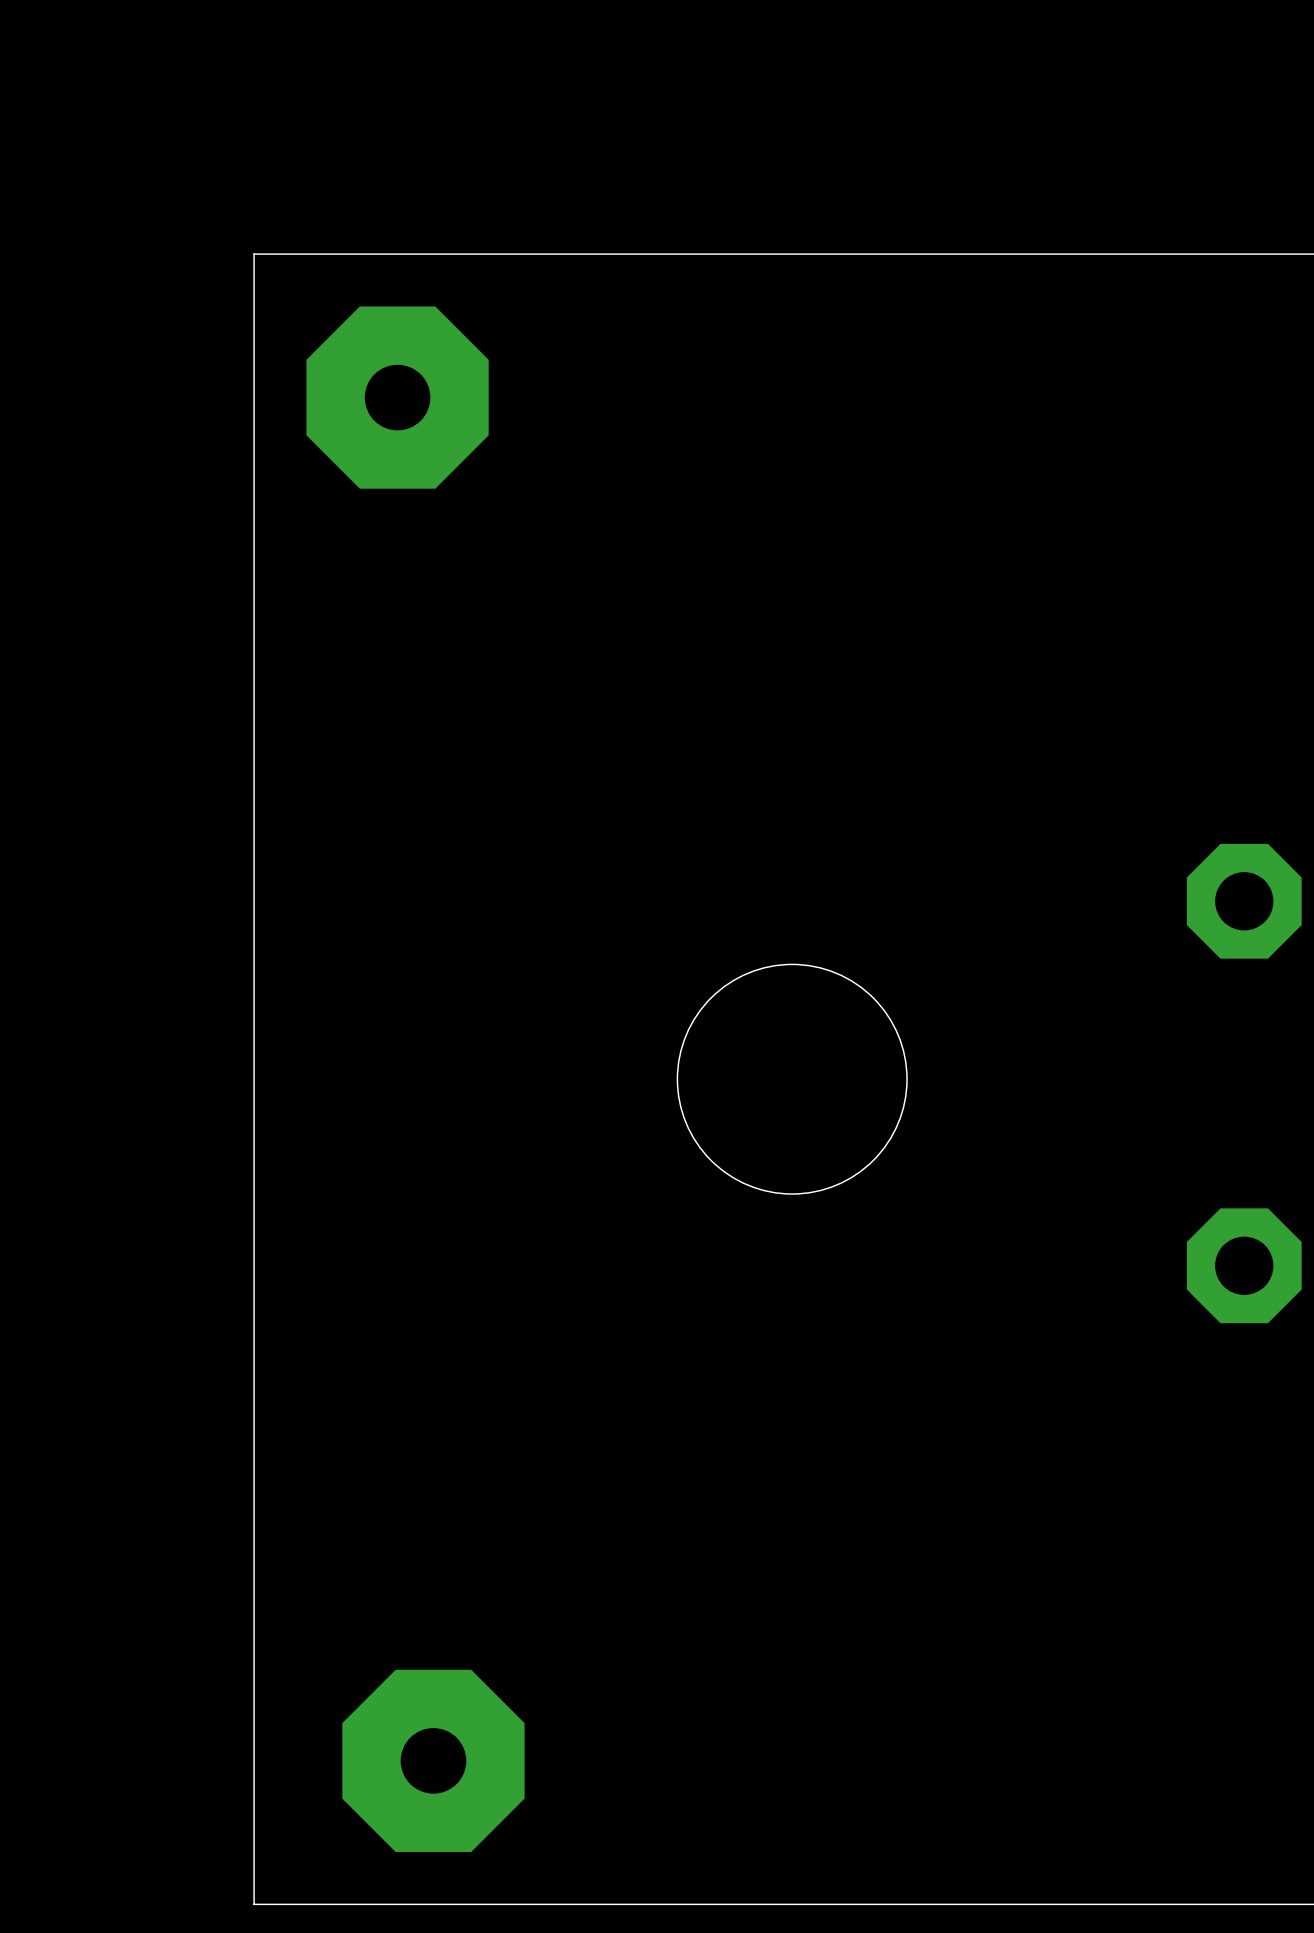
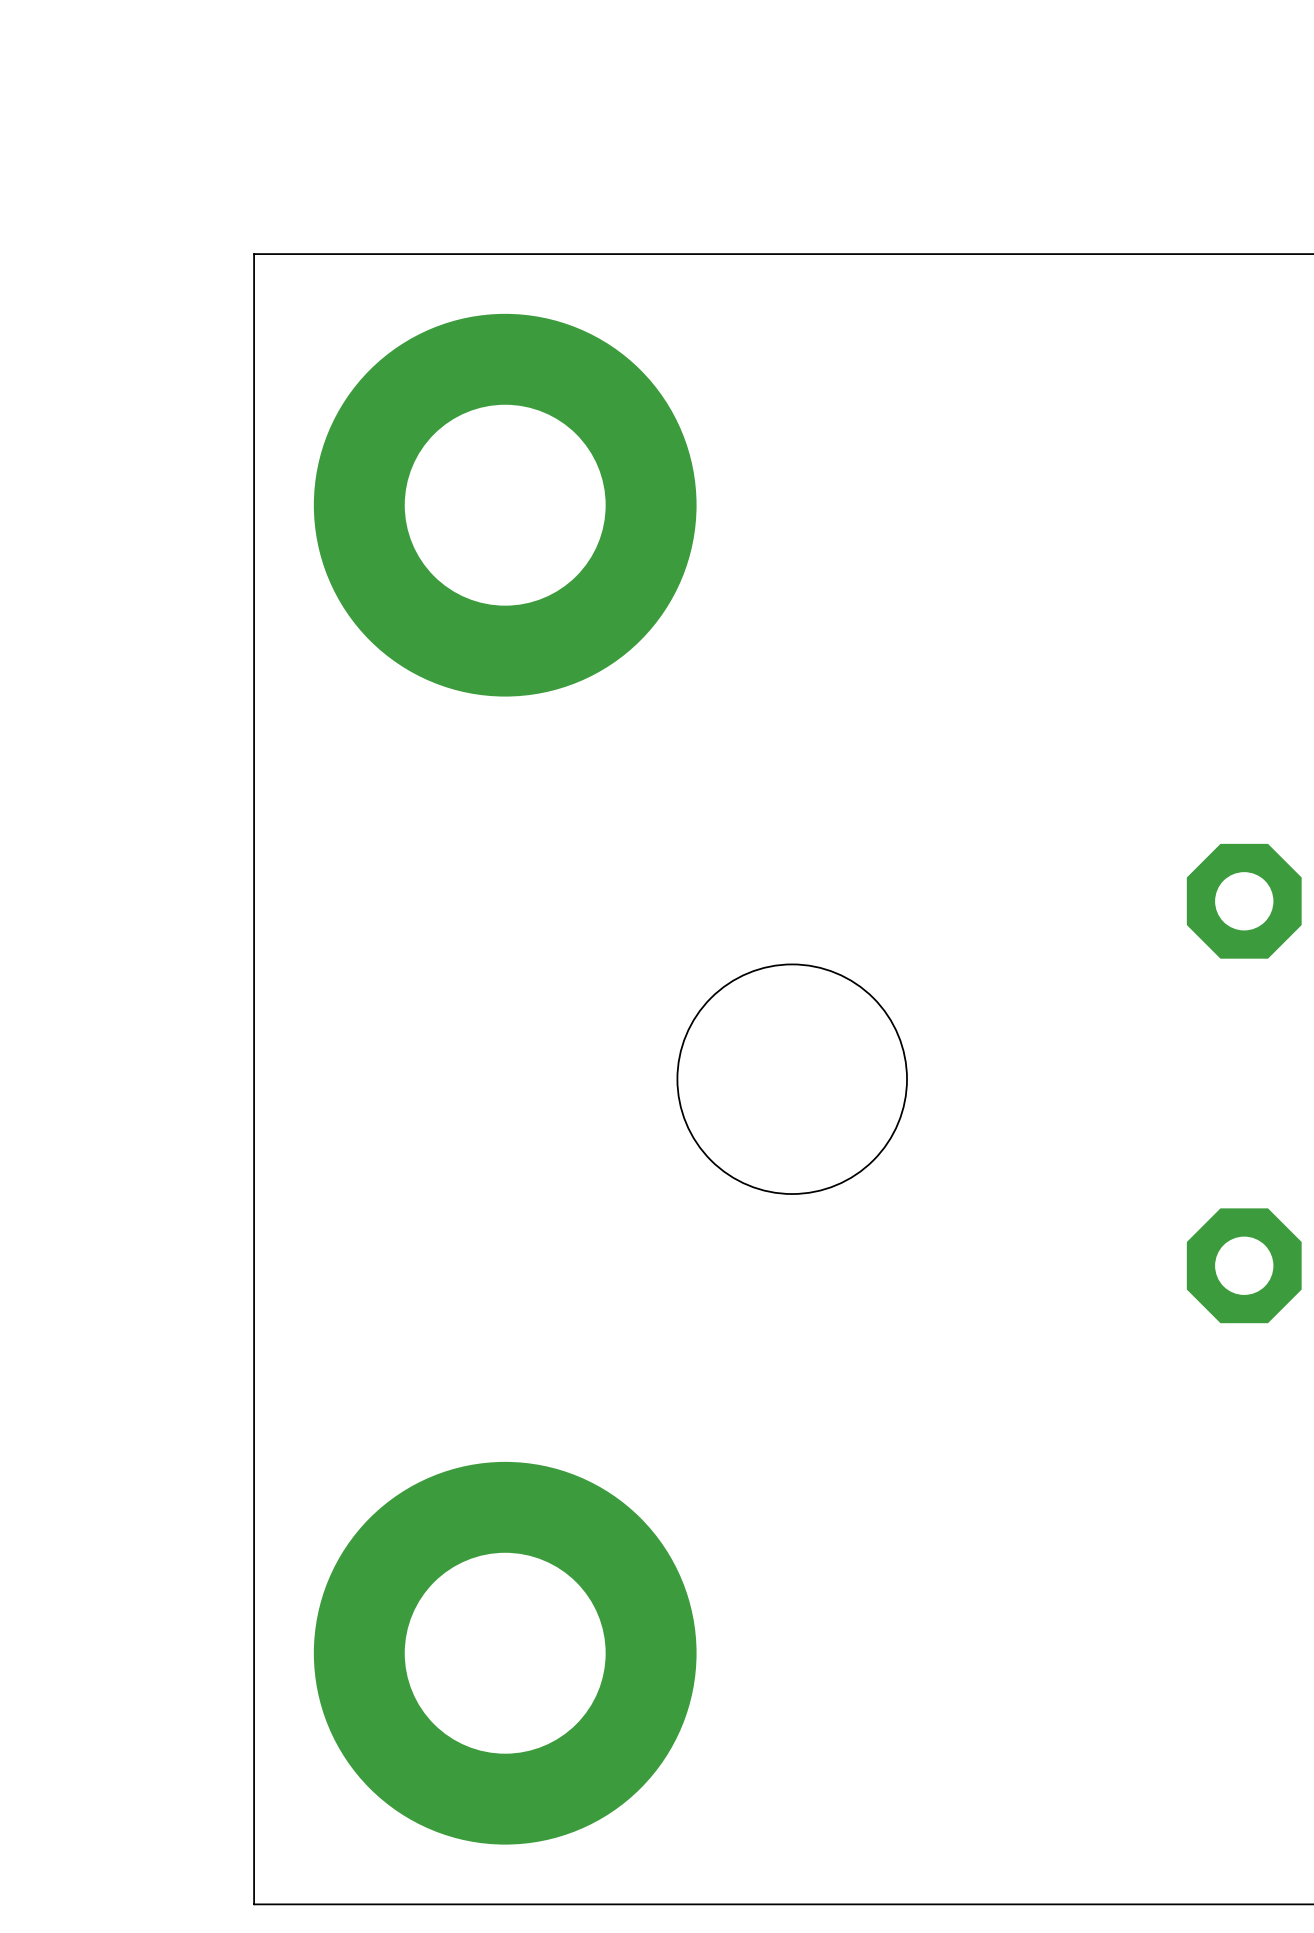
part: (397, 397) -> none
part: none -> (505, 505)
part: none -> (505, 1653)
part: (433, 1760) -> none

